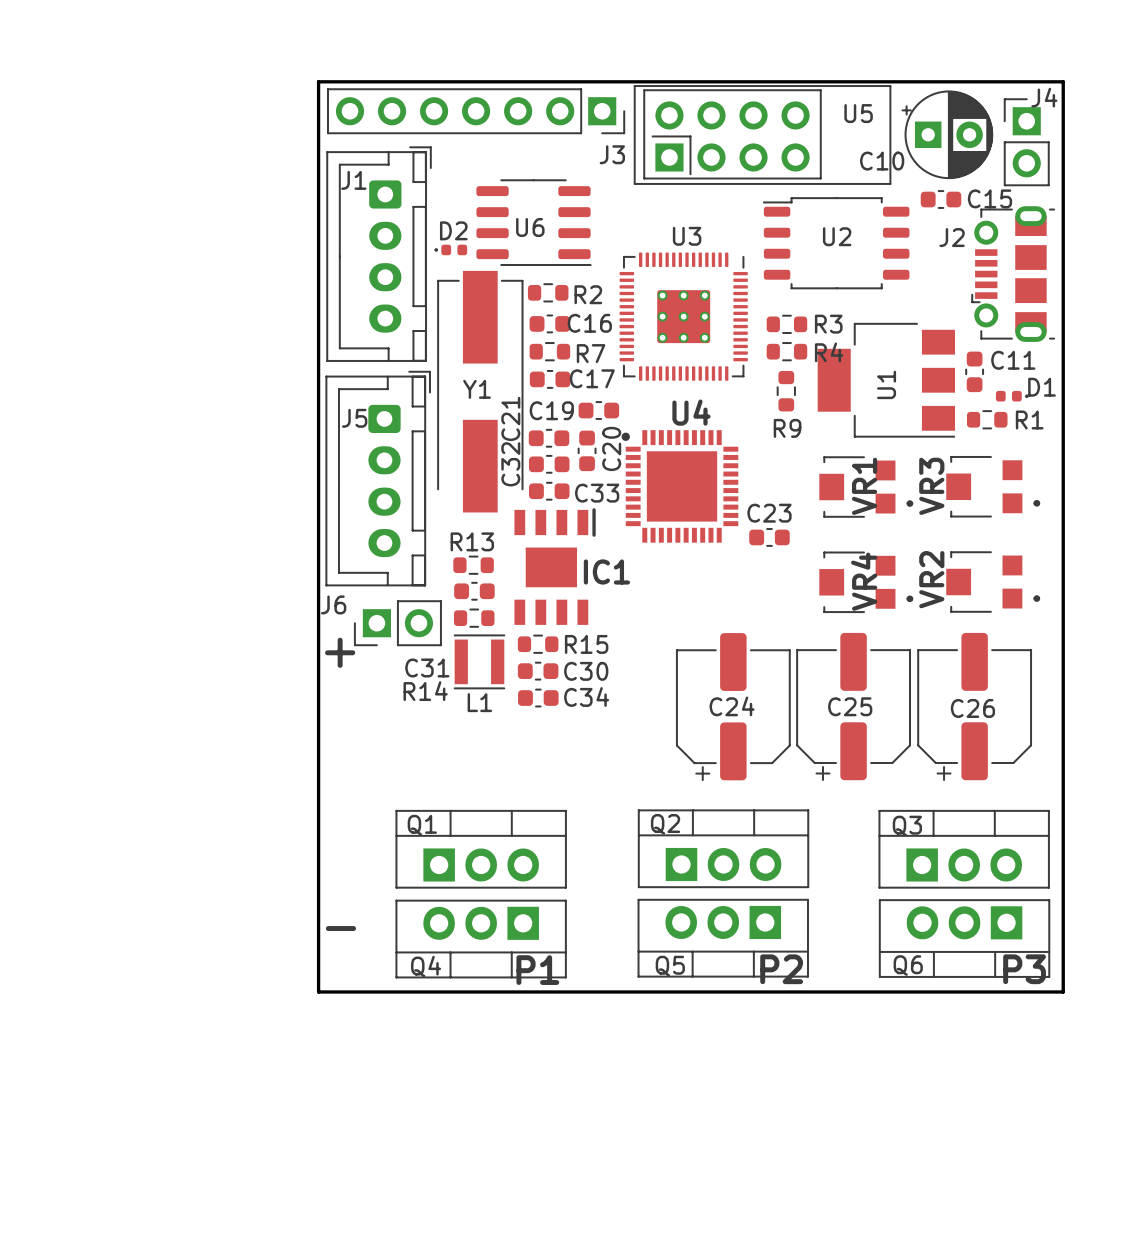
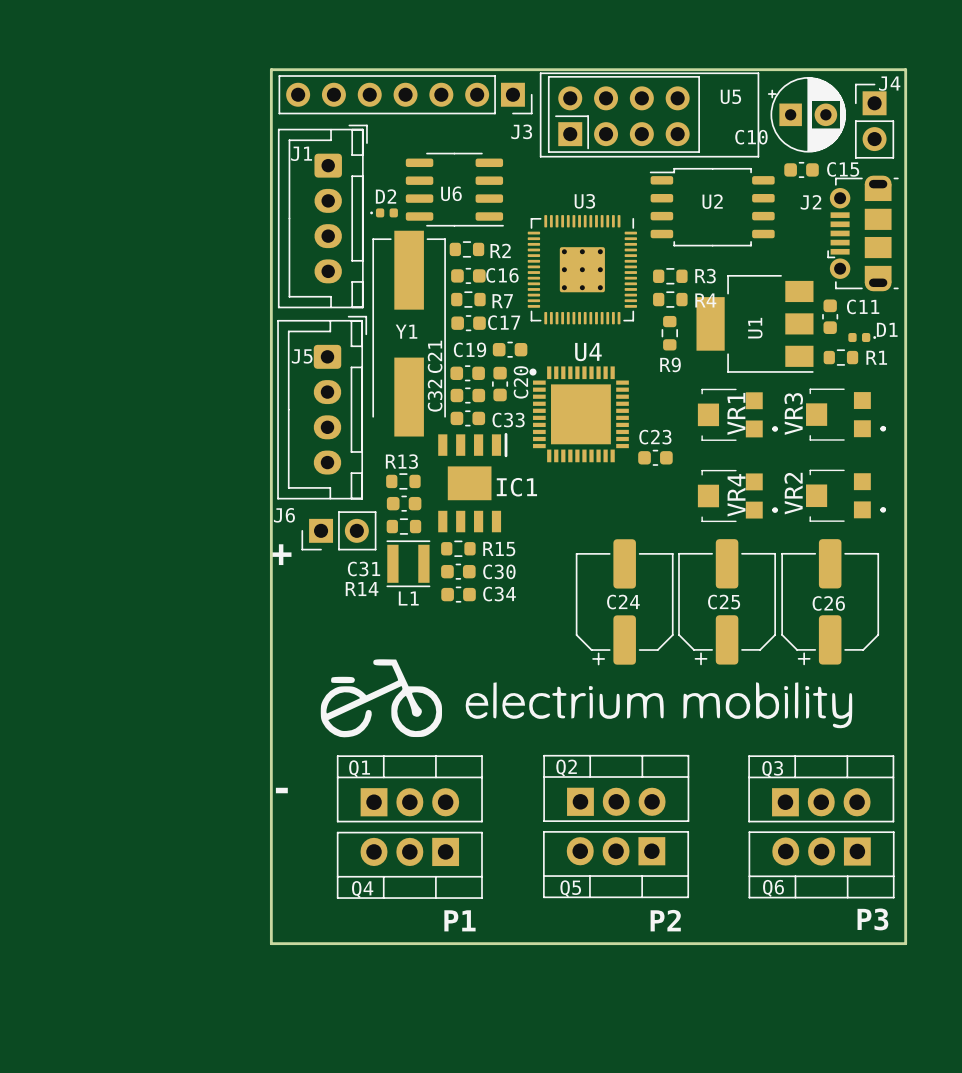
drawing: none -> [320, 659, 853, 738]
Q2 position: (723, 848) -> (616, 788)
Q1 position: (481, 849) -> (409, 788)
Q3 position: (964, 849) -> (821, 788)
Q5 position: (723, 938) -> (616, 864)
Q6 position: (964, 938) -> (821, 864)
Q4 position: (481, 939) -> (409, 865)
text position: P2 (781, 969) -> P2 (665, 920)
text position: P3 (1024, 969) -> P3 (872, 919)
text position: P1 (537, 970) -> P1 (459, 920)
board edge: (318, 991) (1063, 991) -> (271, 844) (271, 943) (905, 943) (905, 844)

